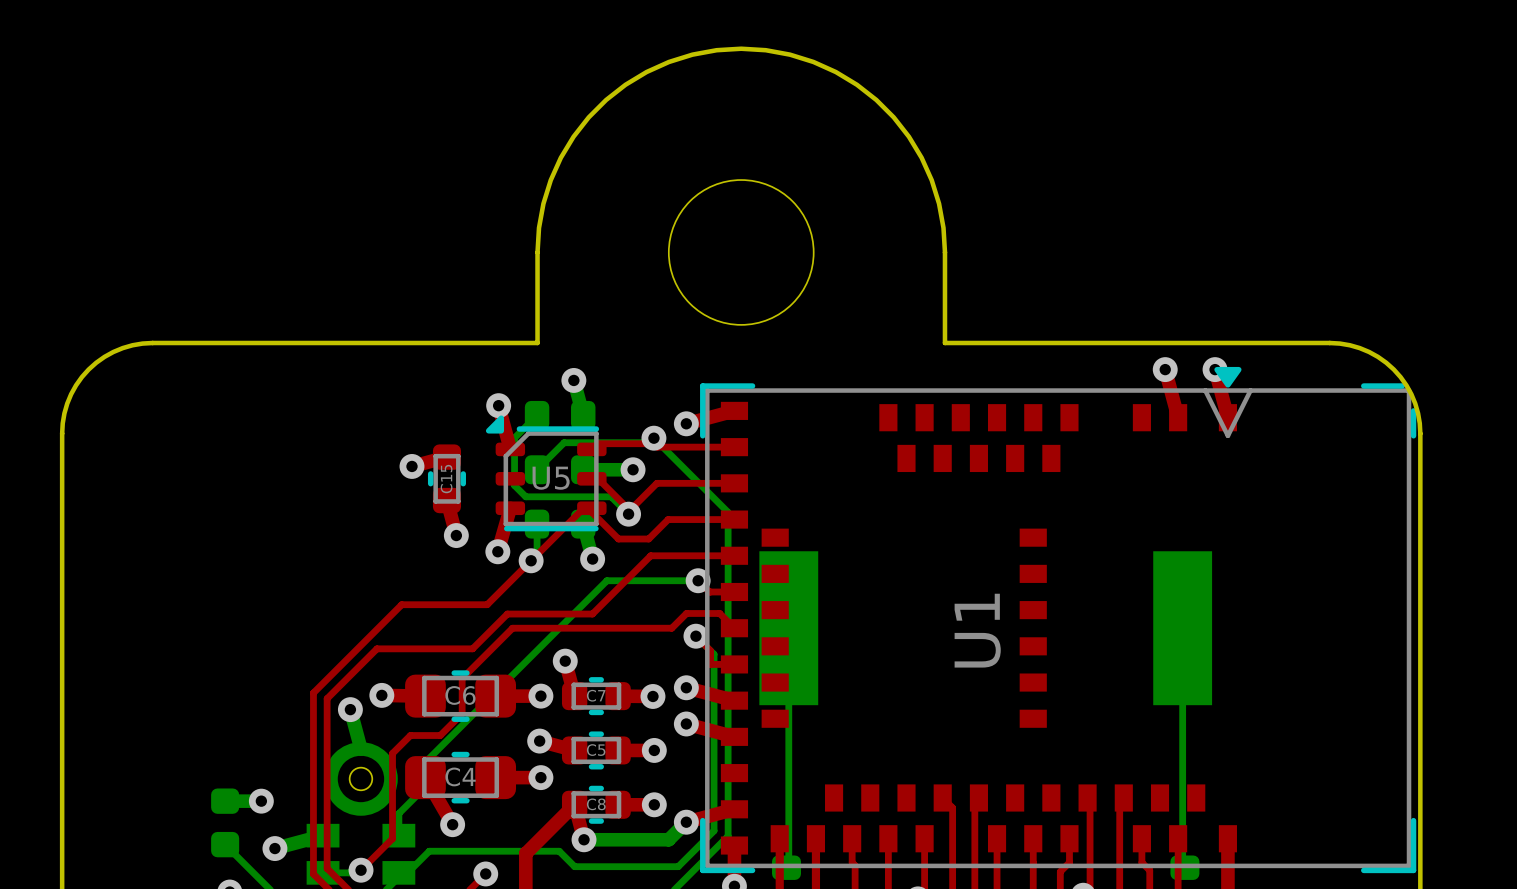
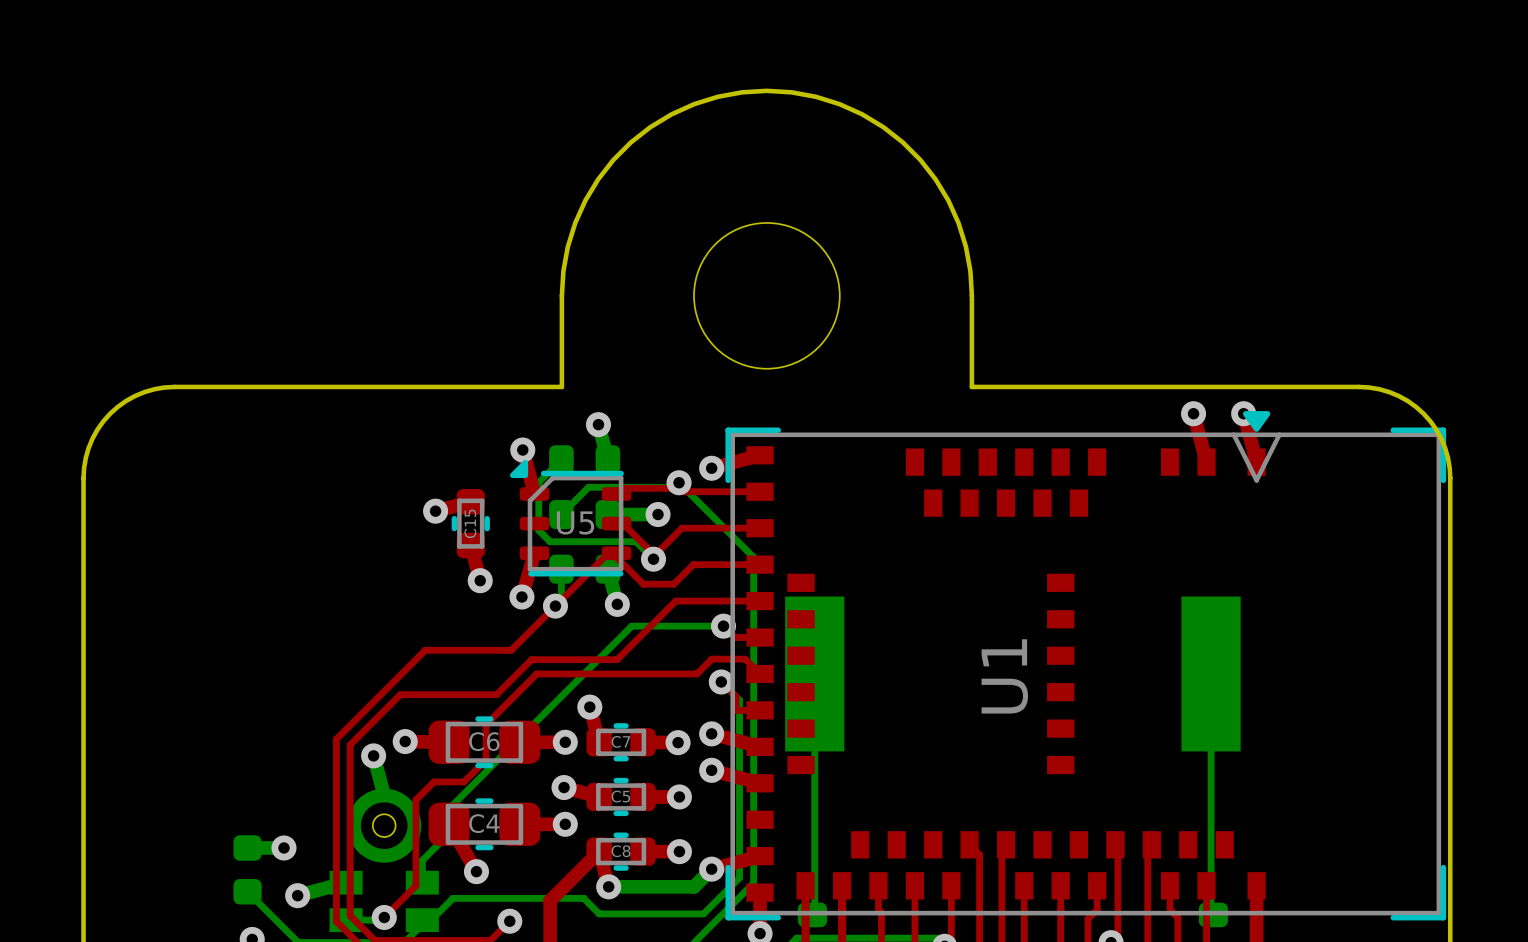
U1 footprint: [700, 366, 1417, 874] -> [725, 411, 1447, 921]

